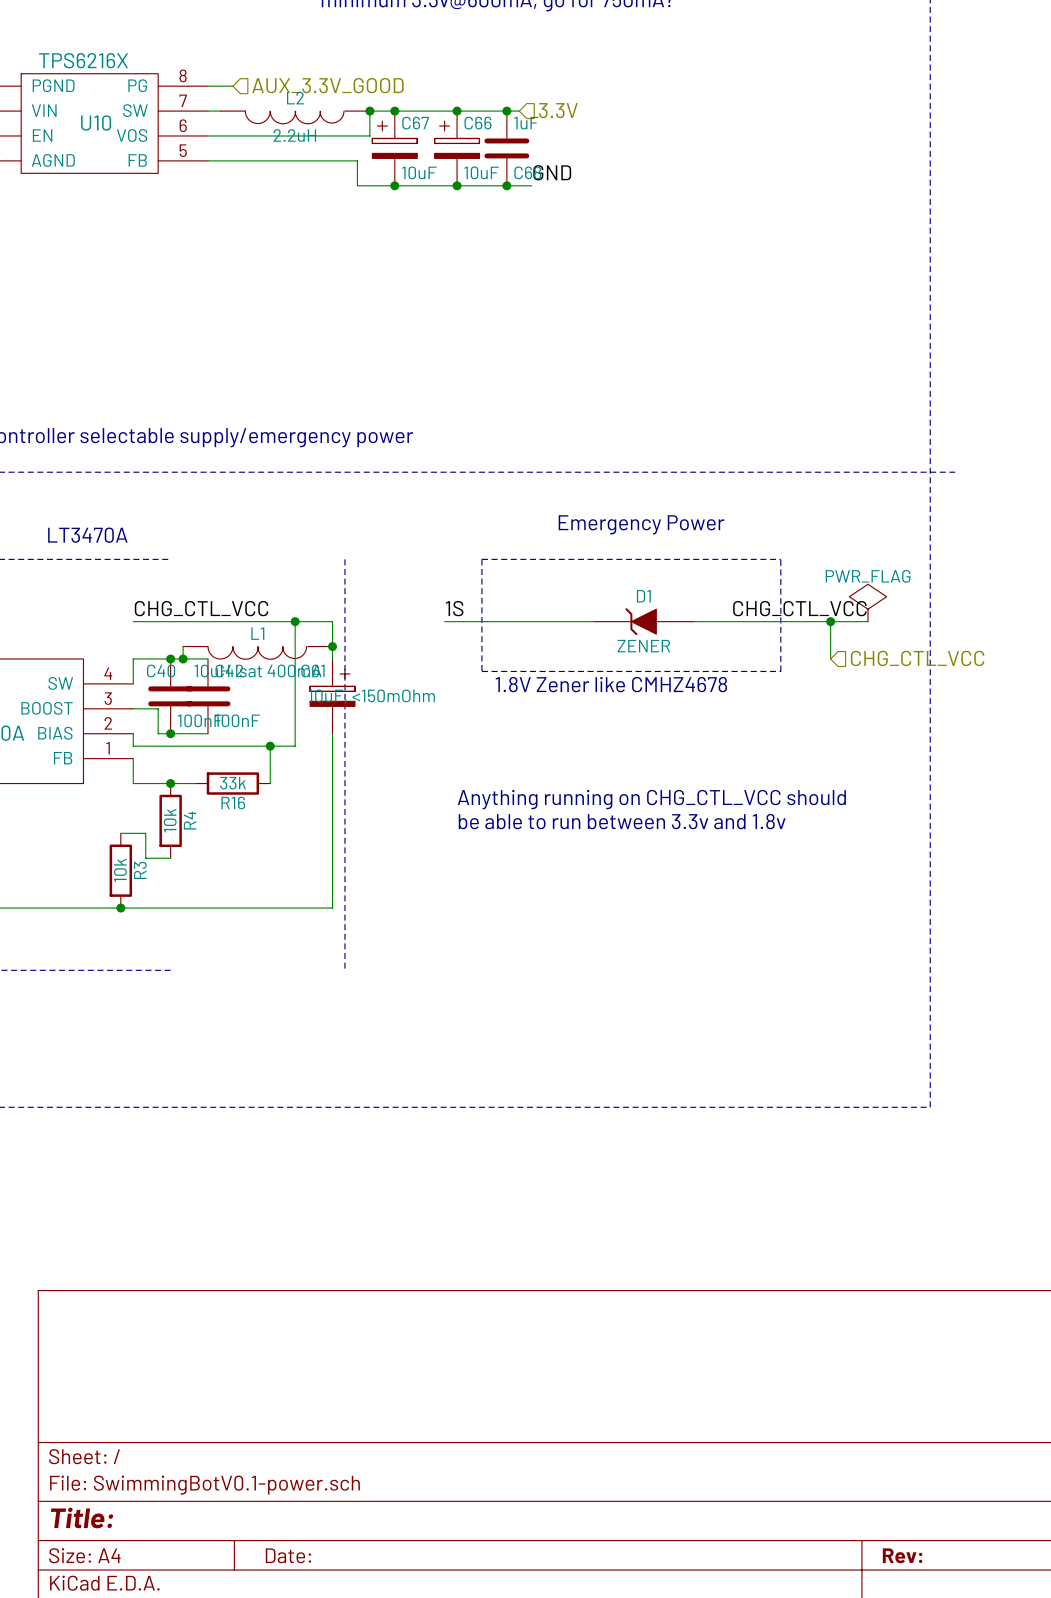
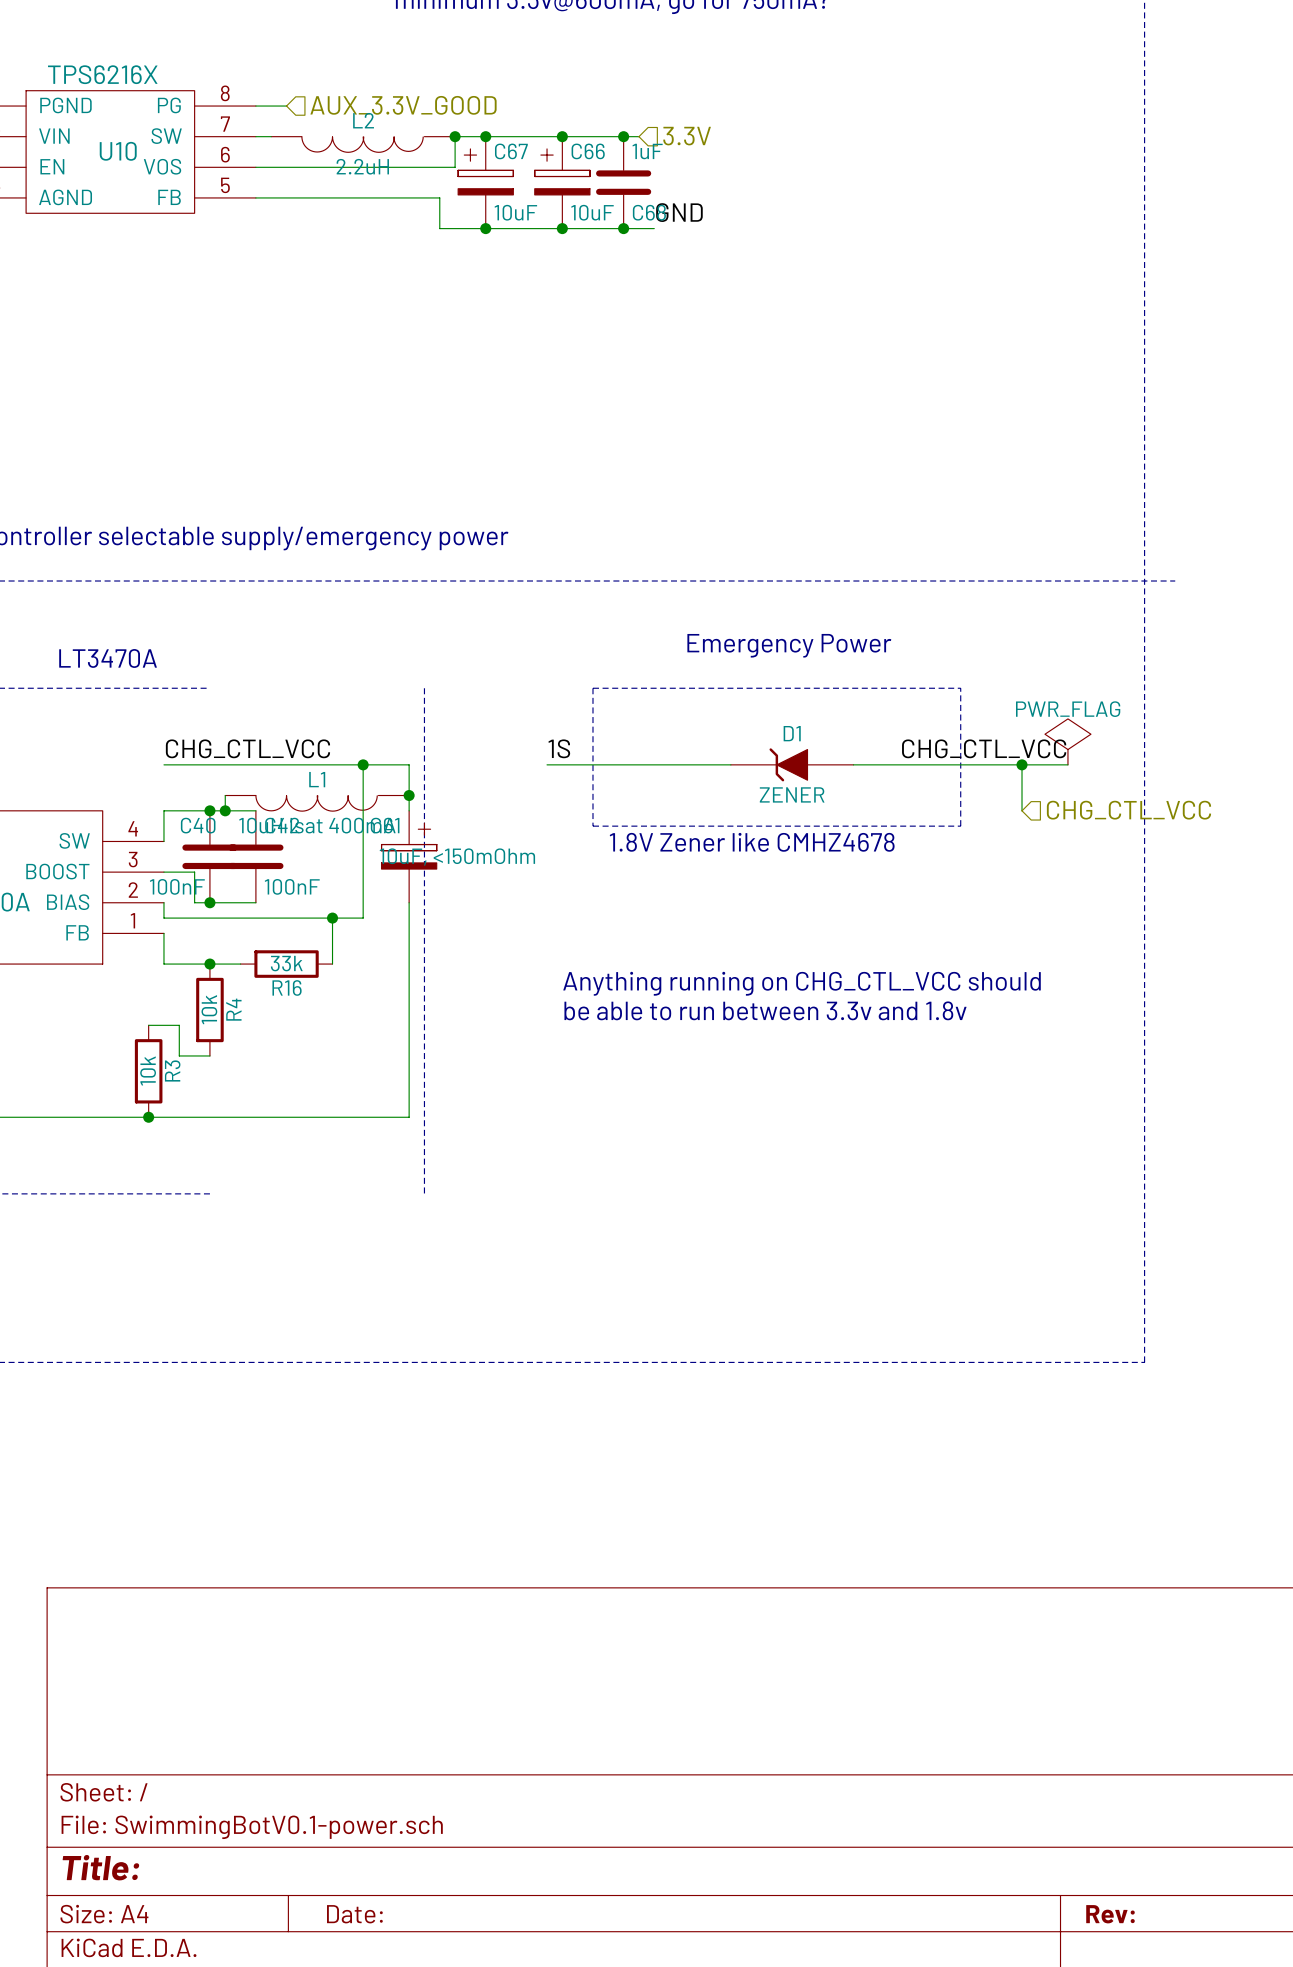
C40 value position: 100nF (200, 720) -> 100nF (177, 886)

